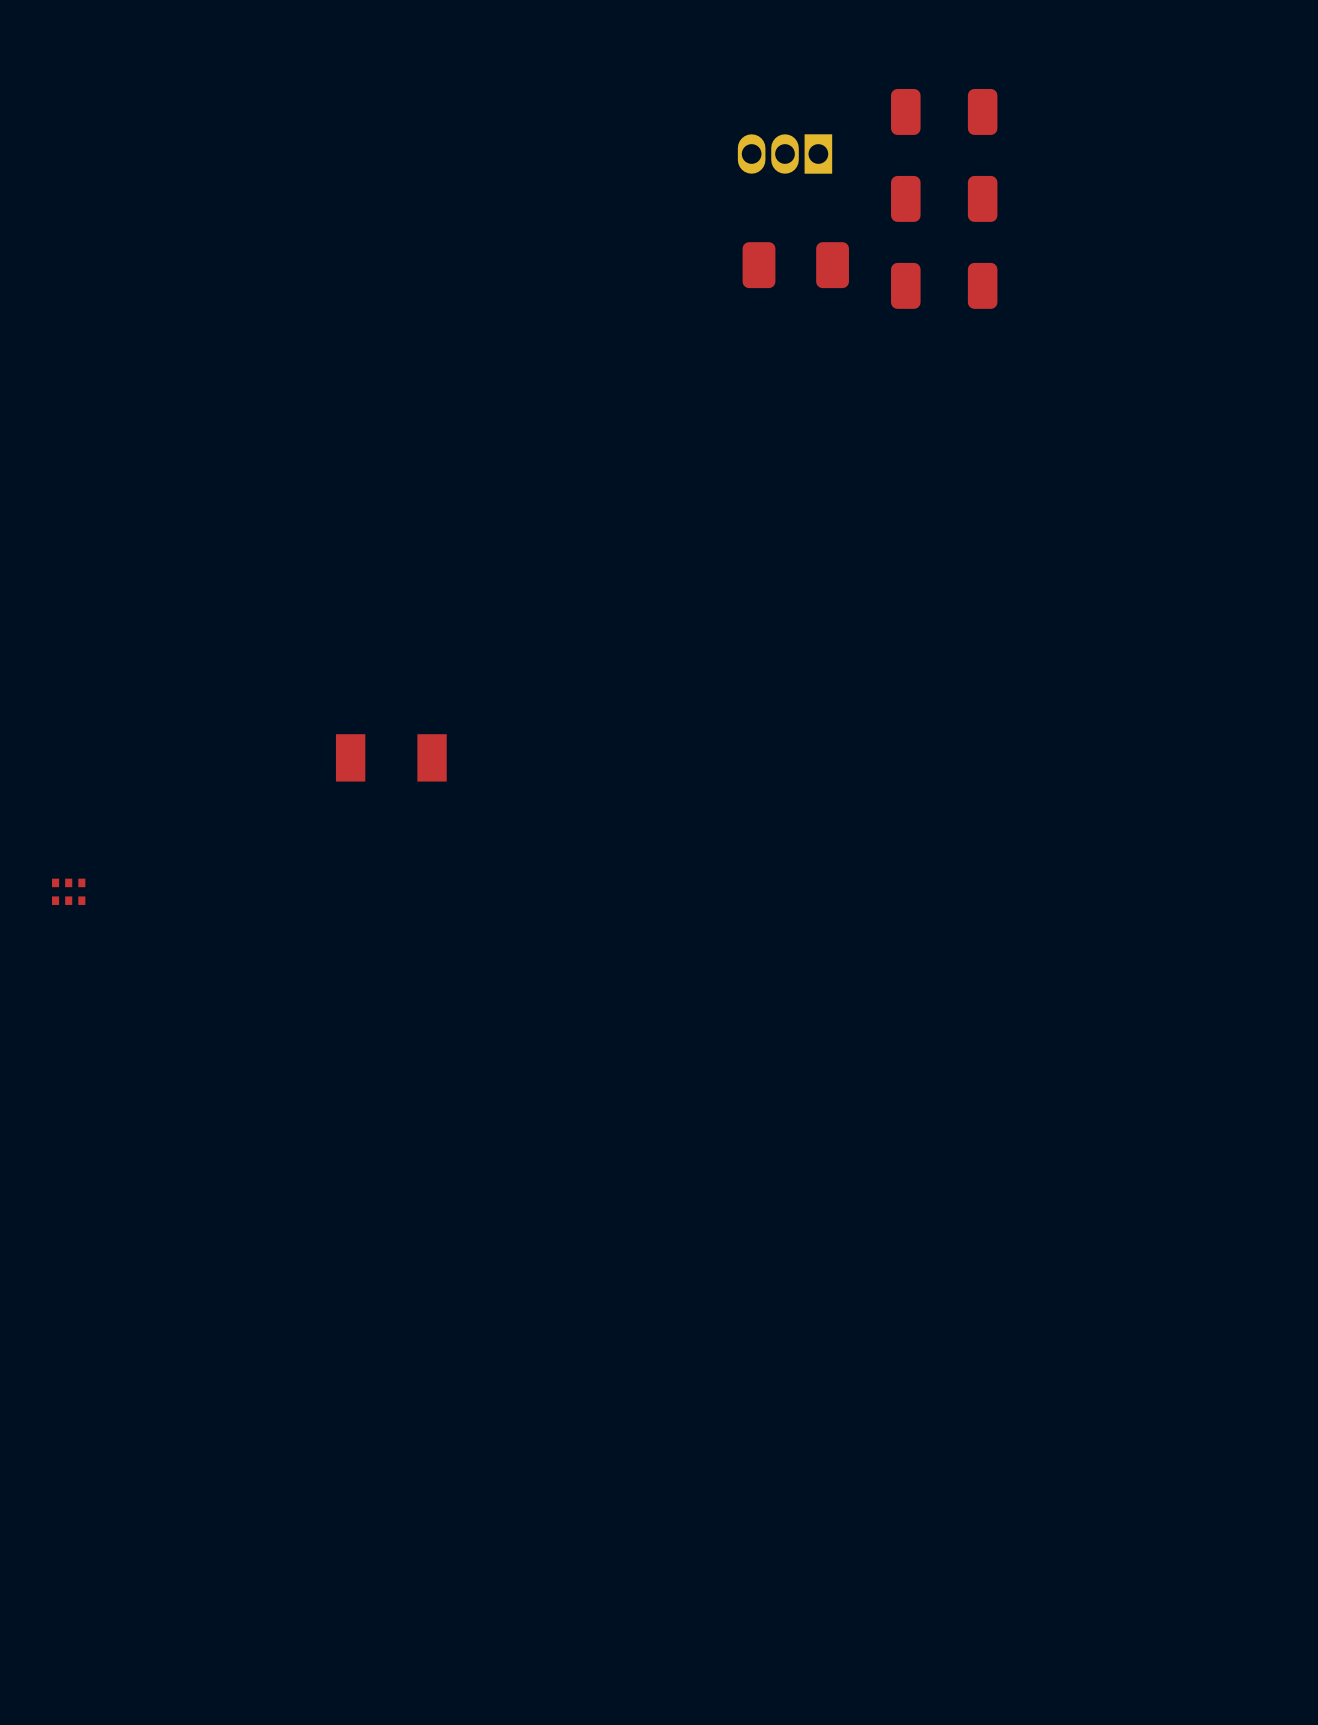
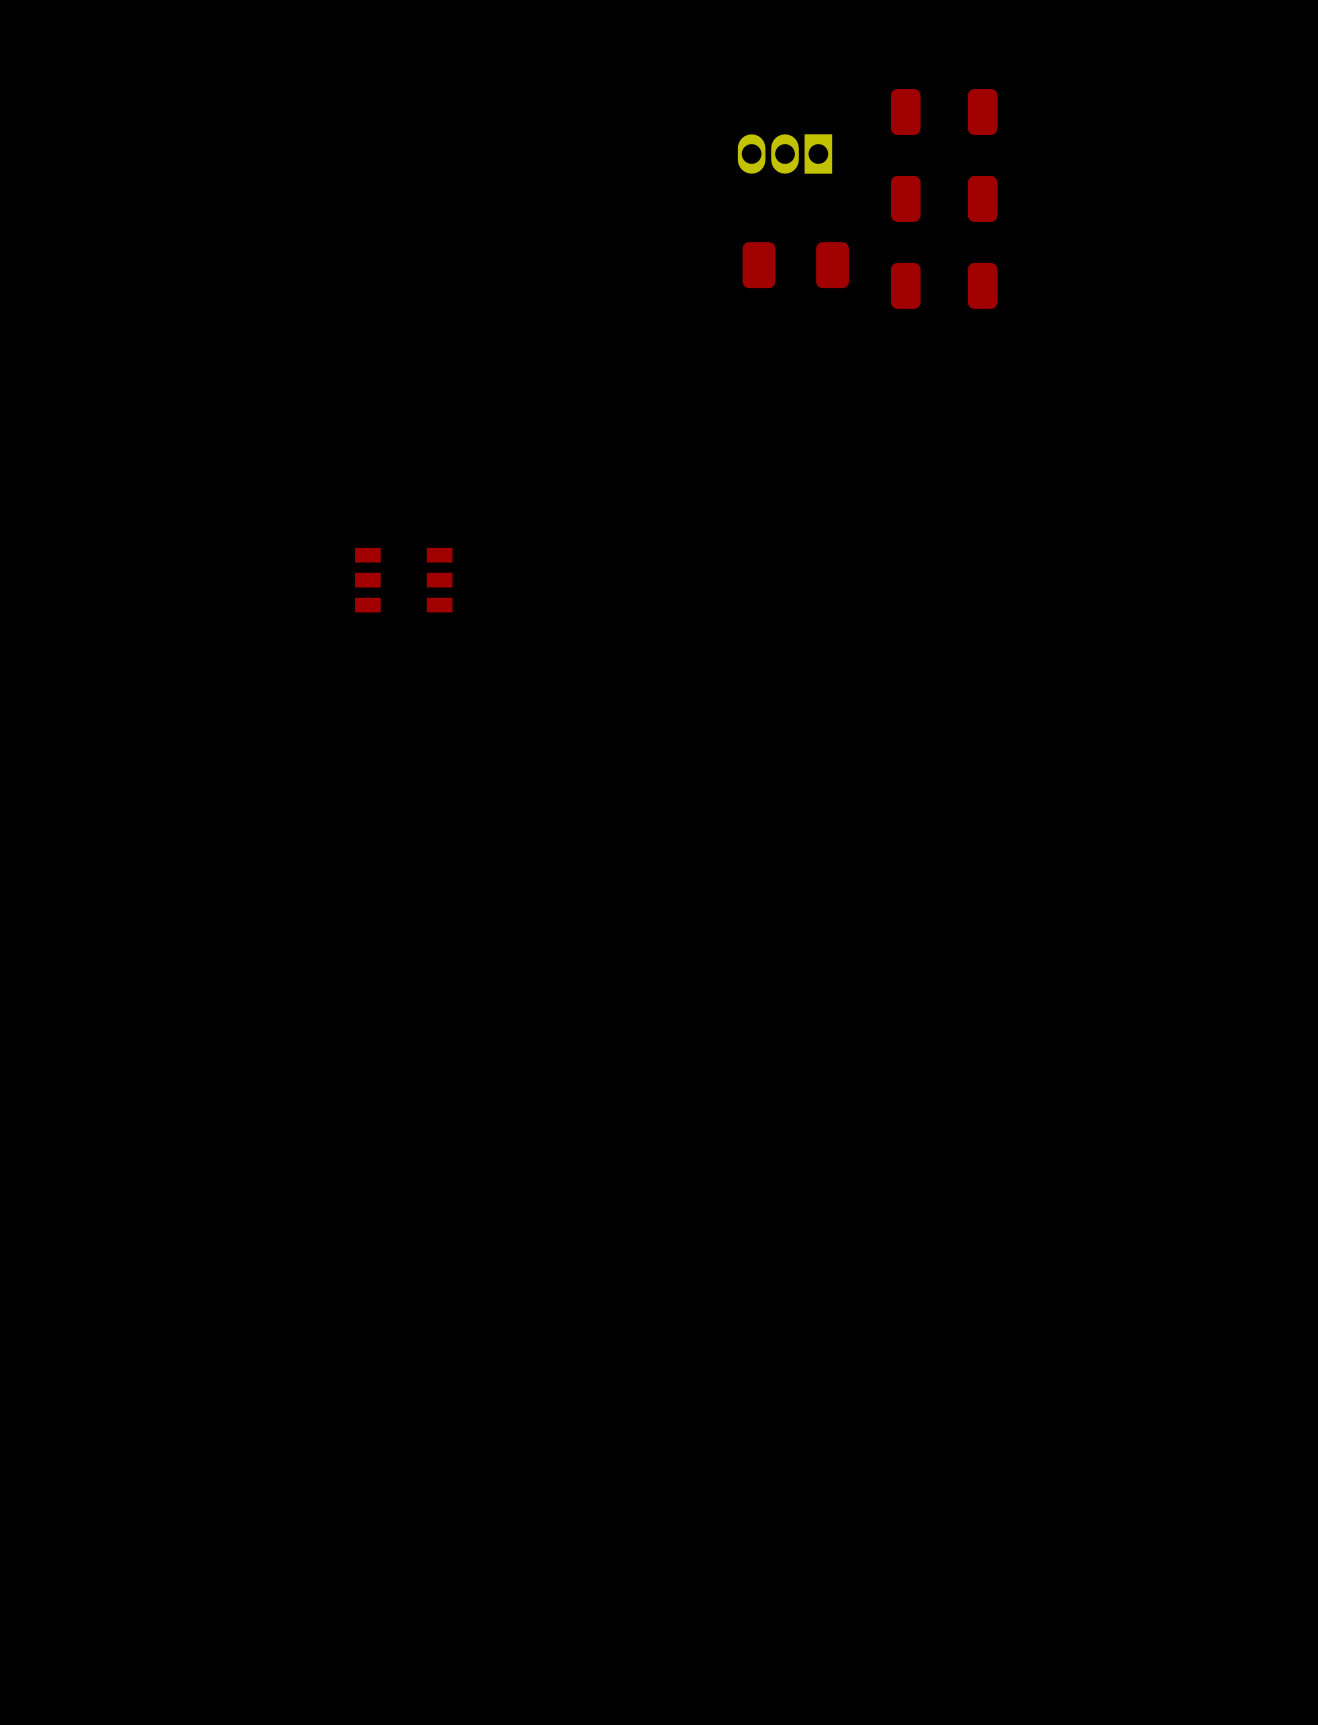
part: none -> (403, 580)
part: (391, 757) -> none
part: (68, 891) -> none

